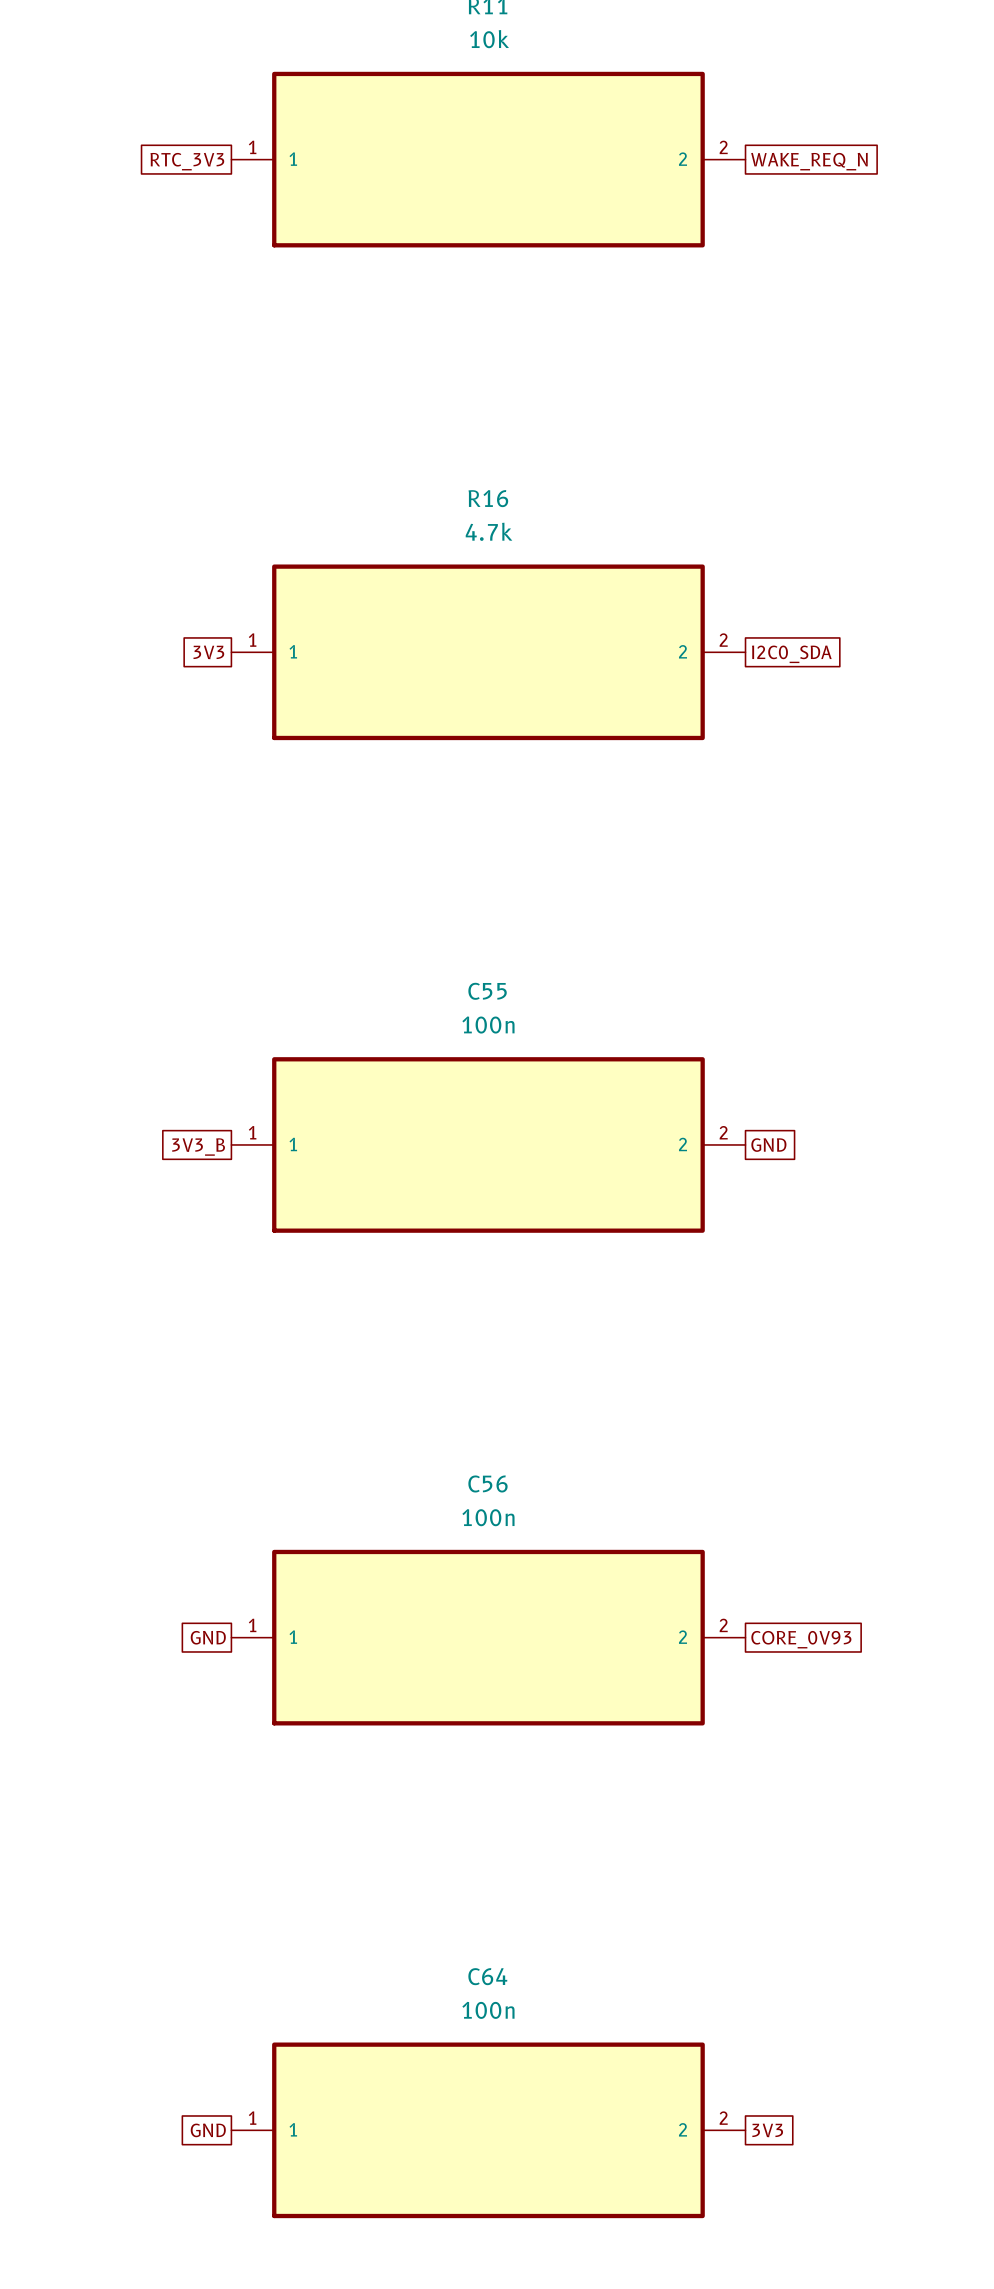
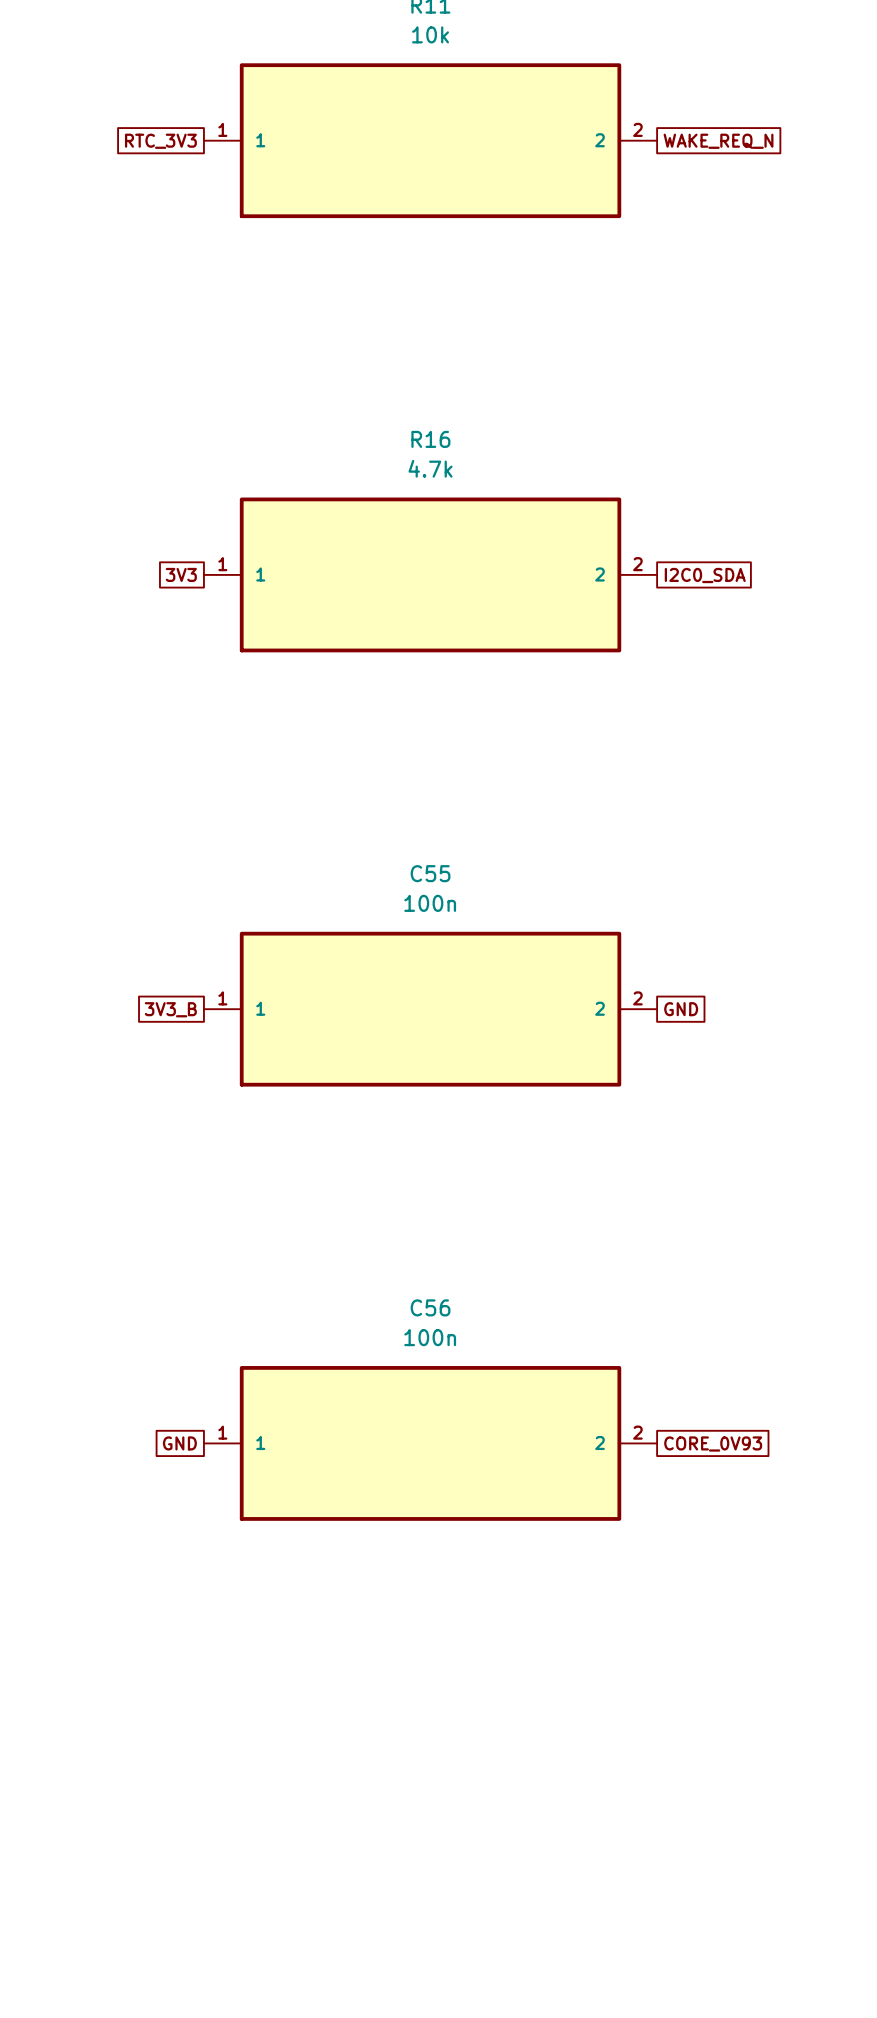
global label: GND (208, 2130) -> none
C64: 100n (488, 2130) -> none
global label: 3V3 (767, 2130) -> none

